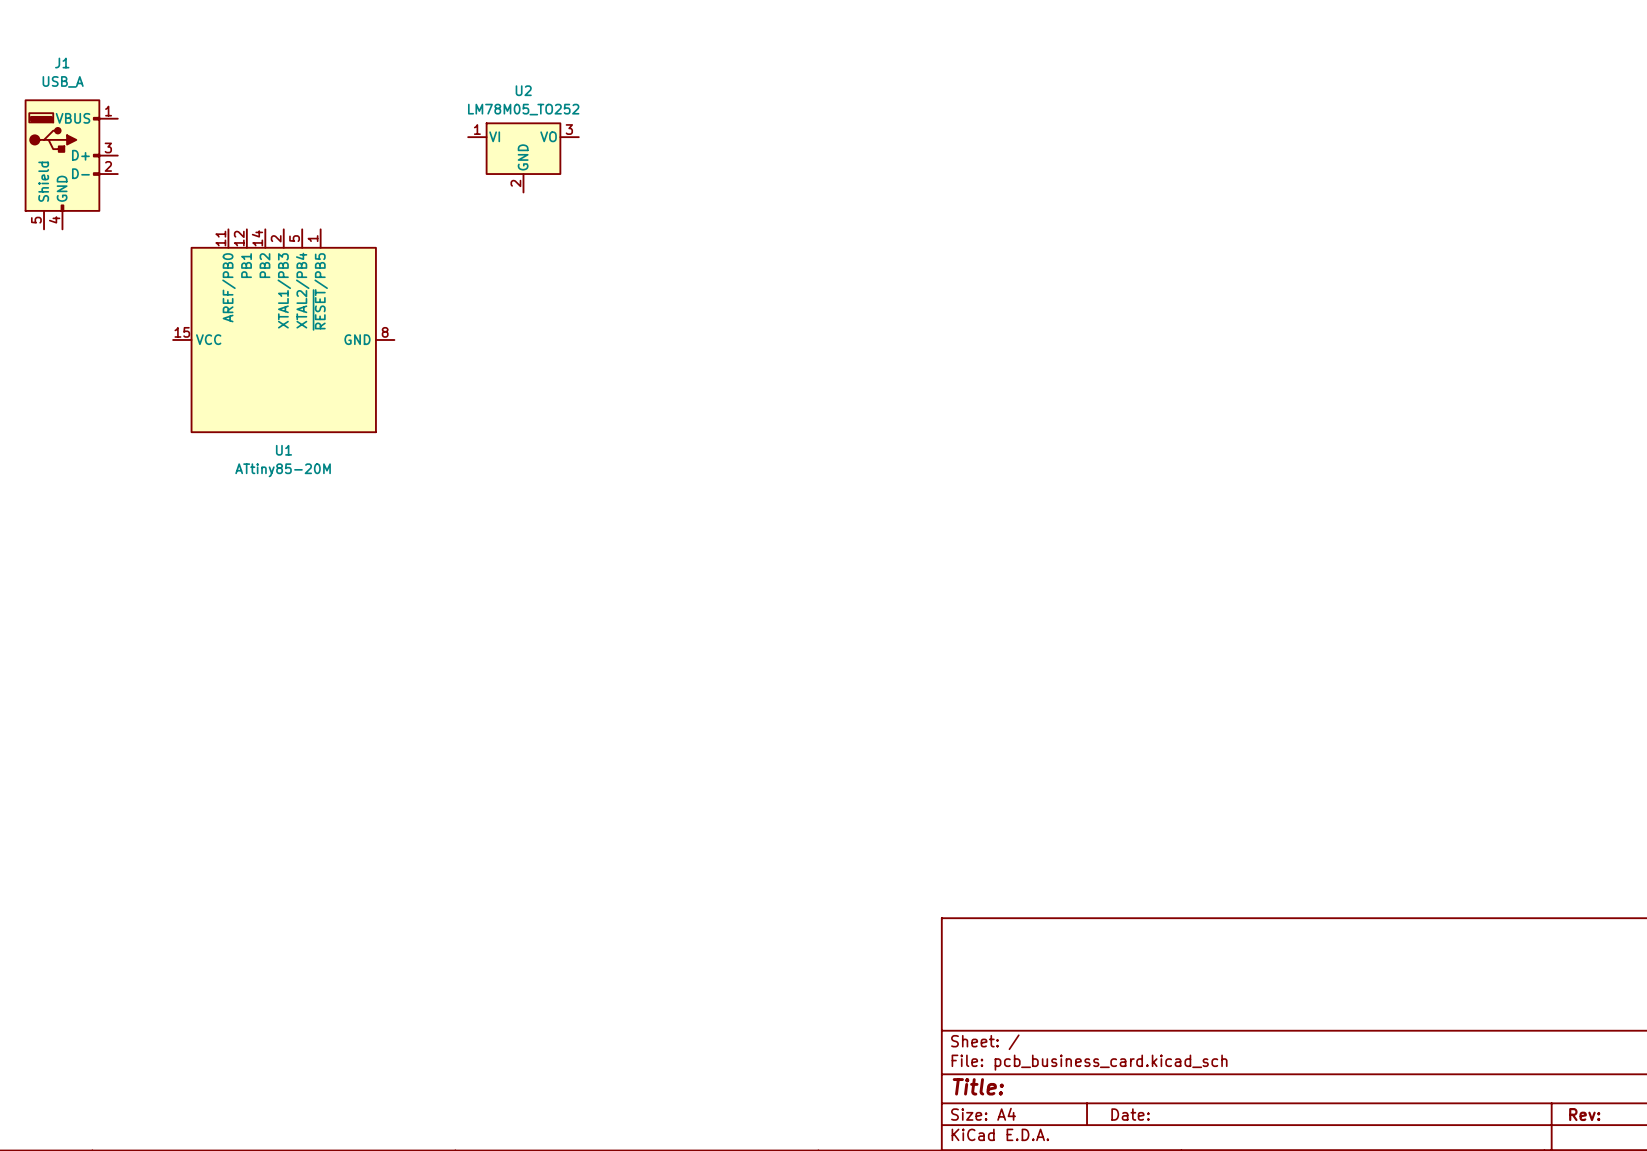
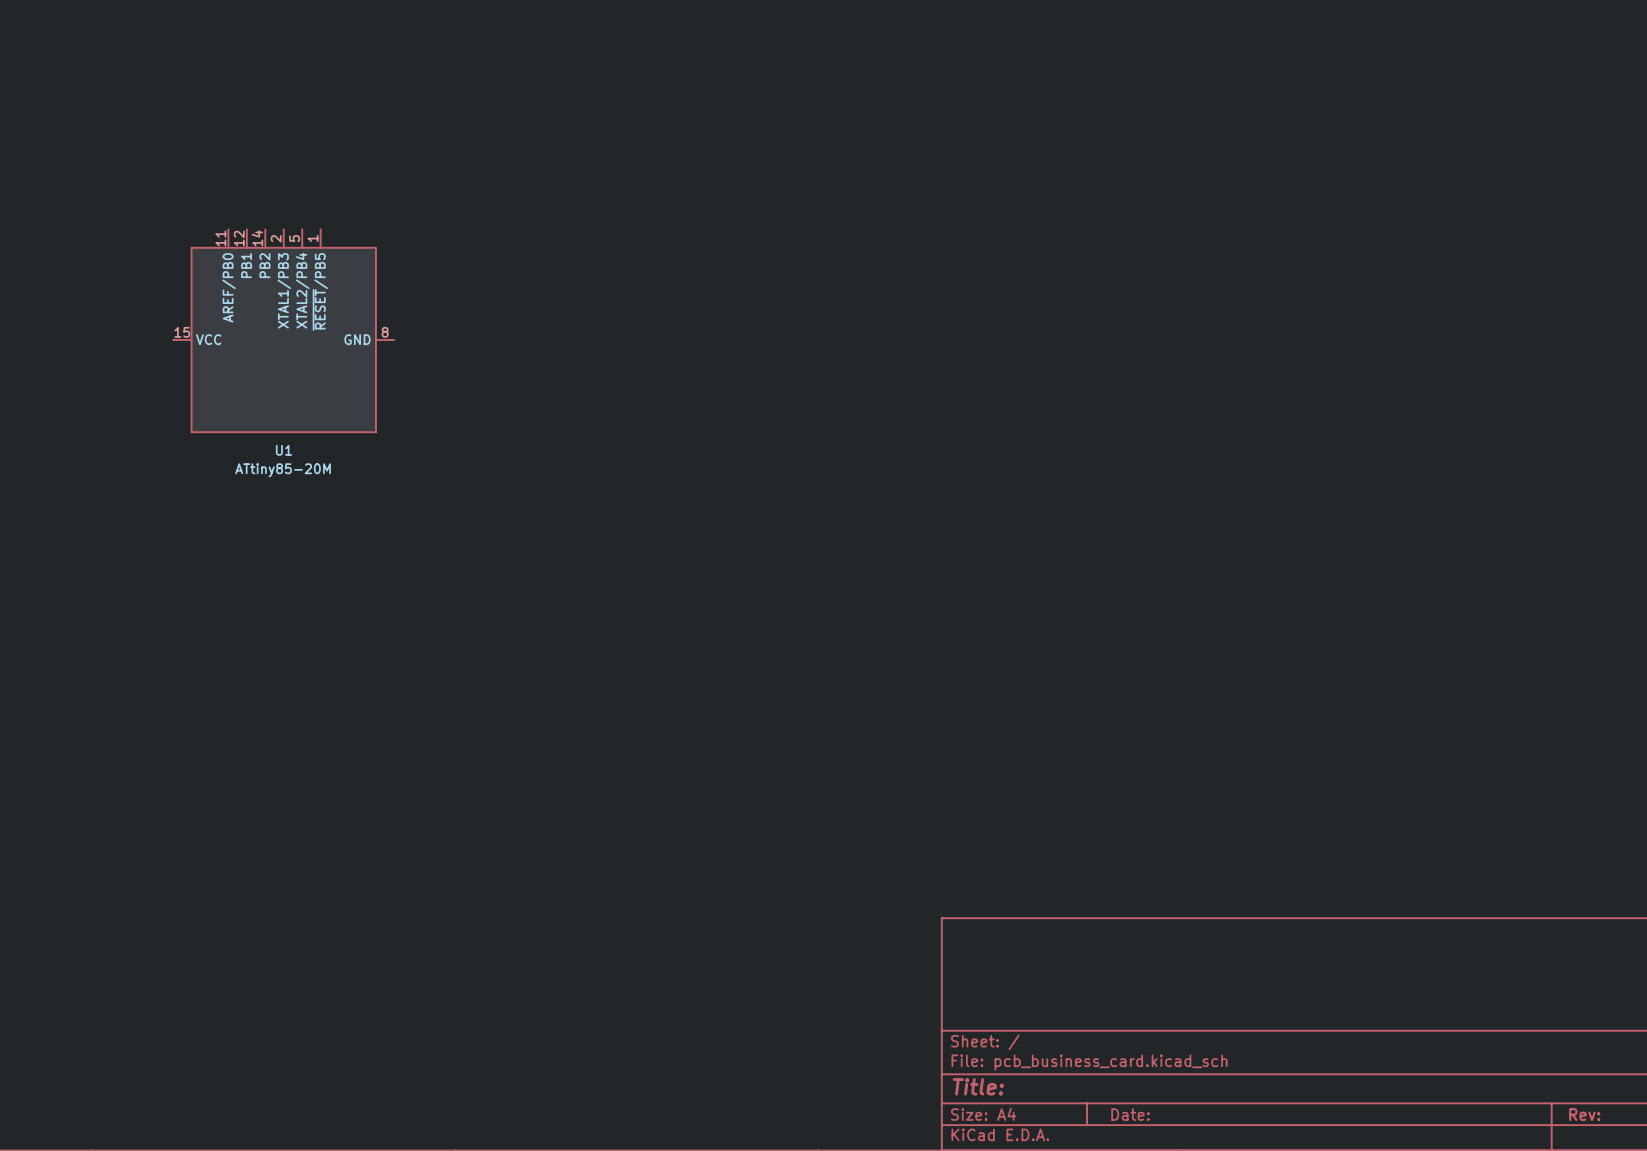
U2: LM78M05_TO252 (523, 157) -> none
J1: USB_A (71, 164) -> none

